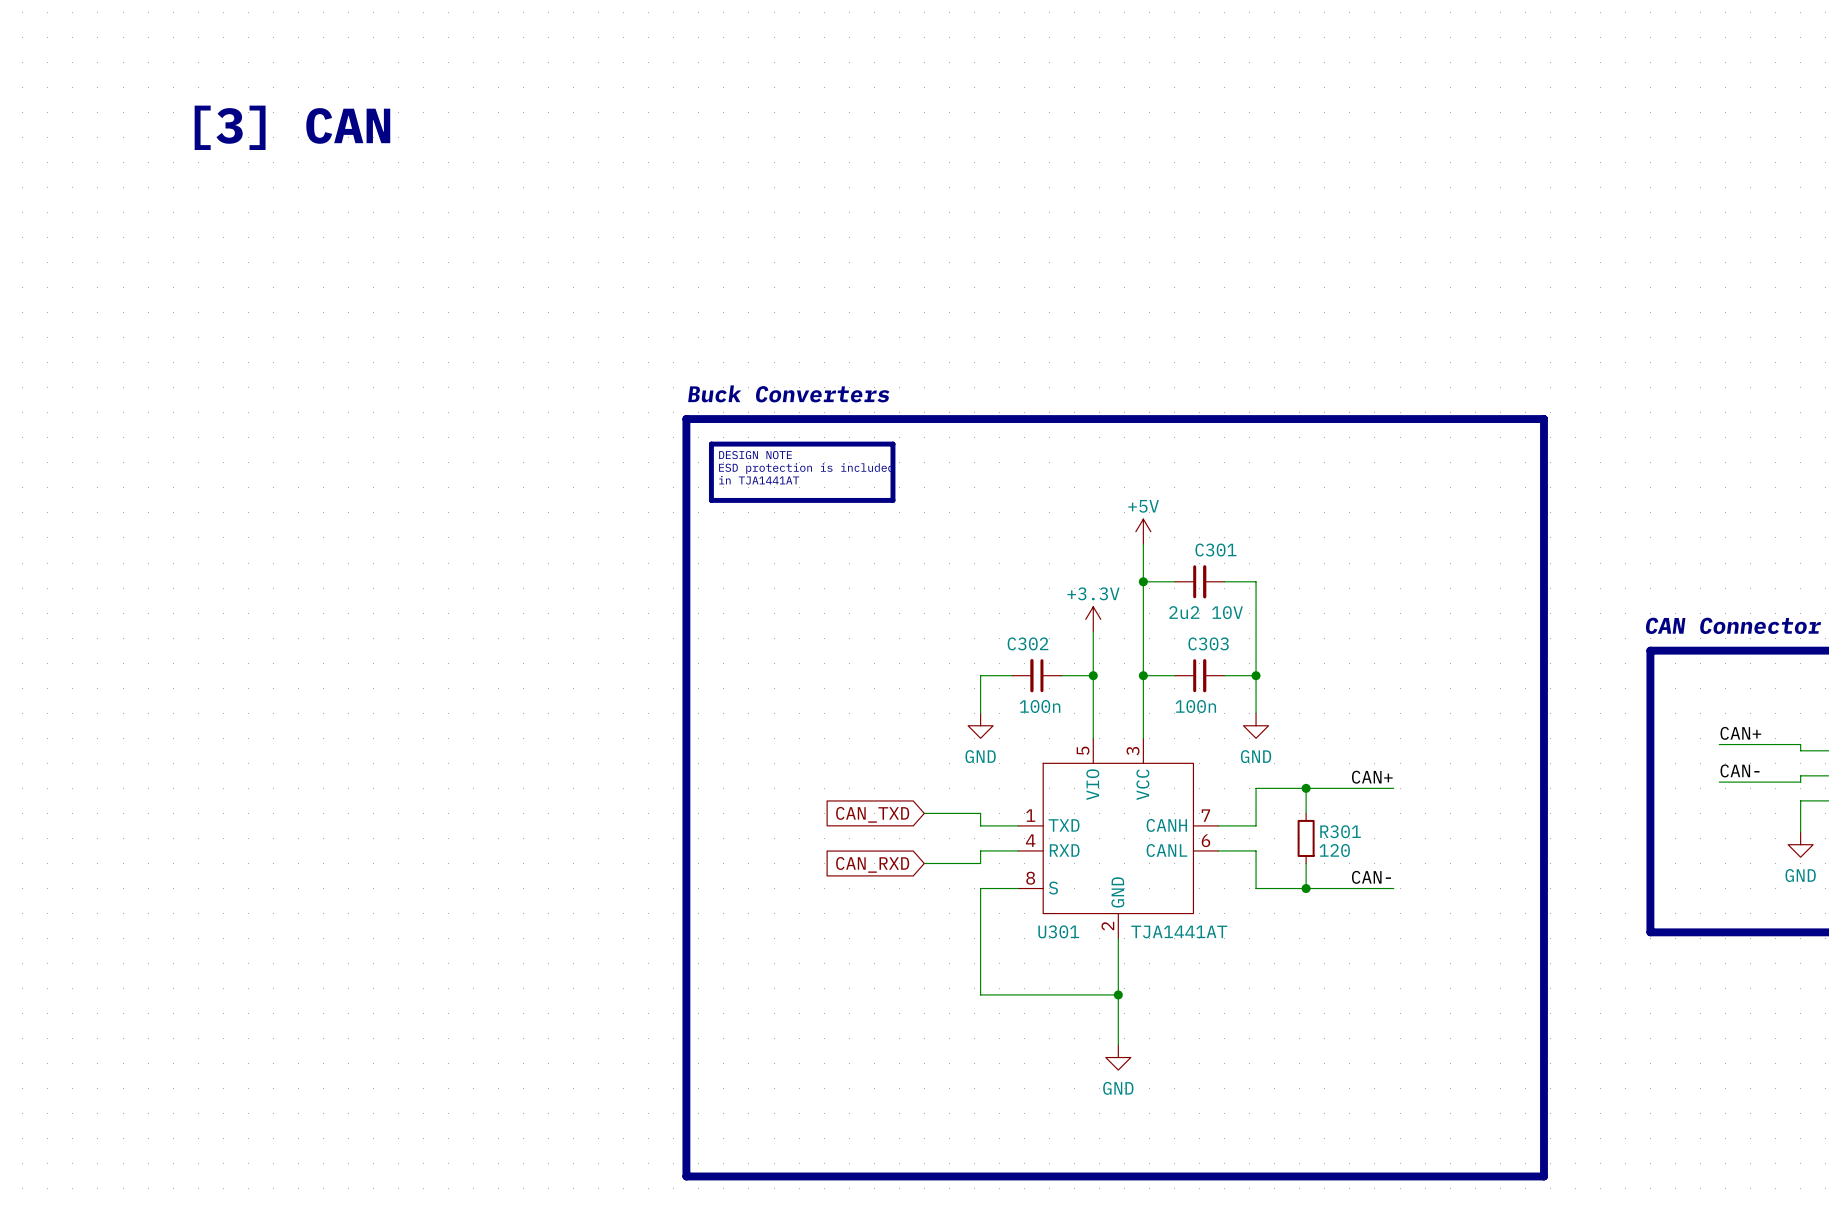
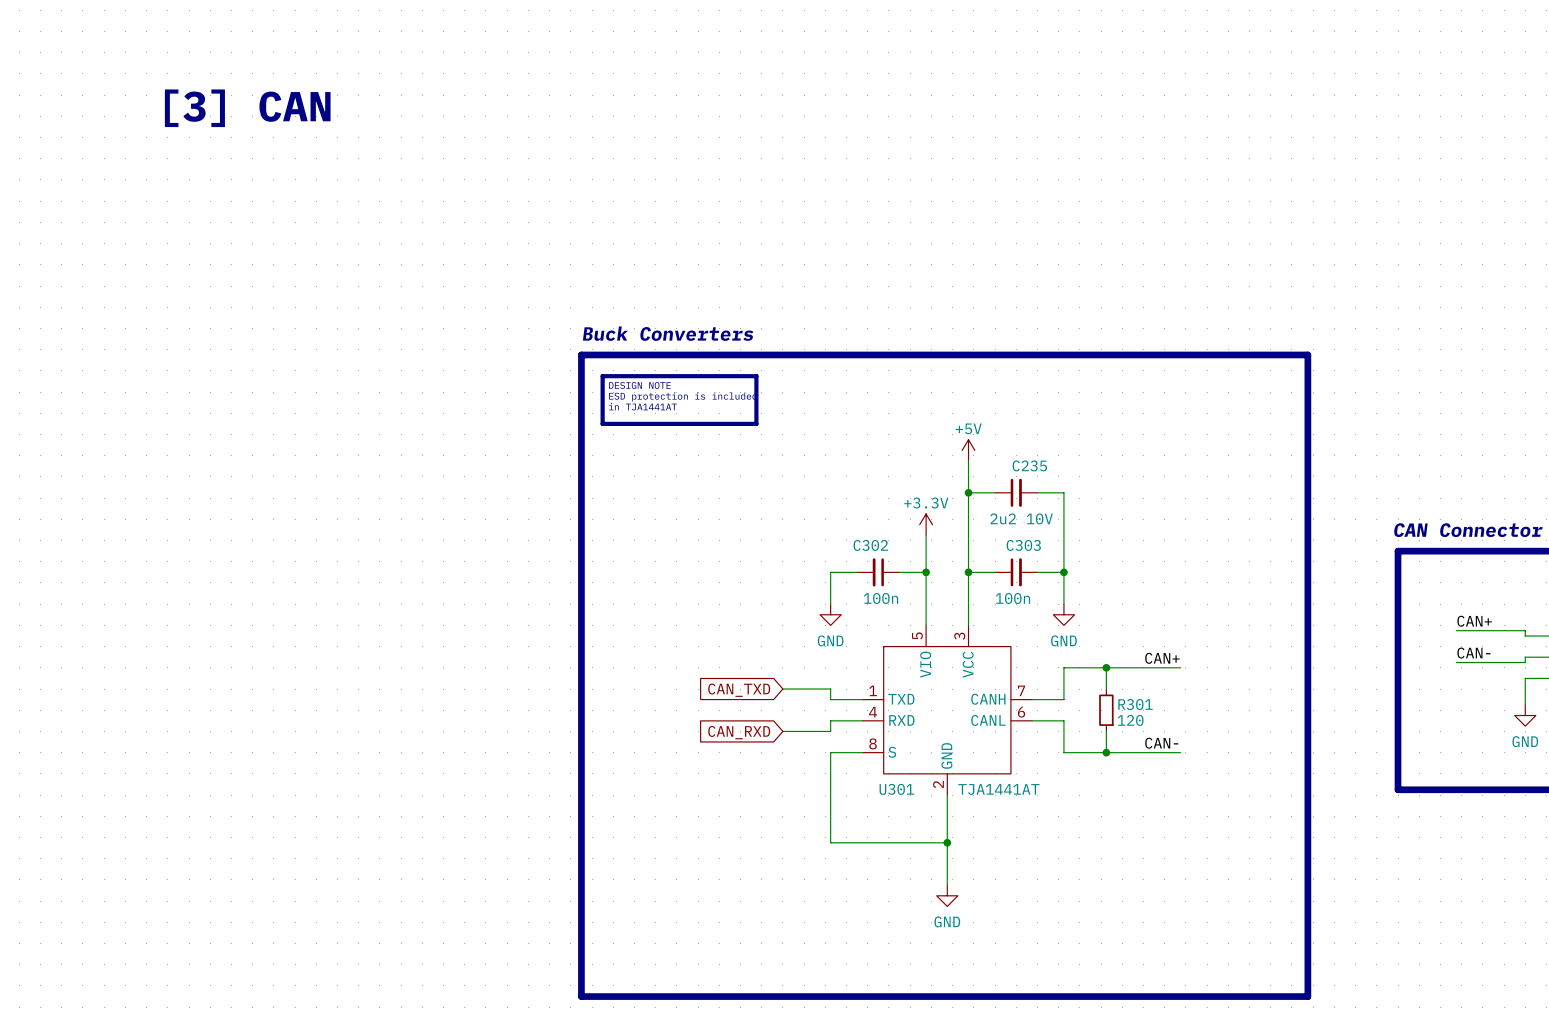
C301 name: C301 (1215, 550) -> C235 (1029, 465)

